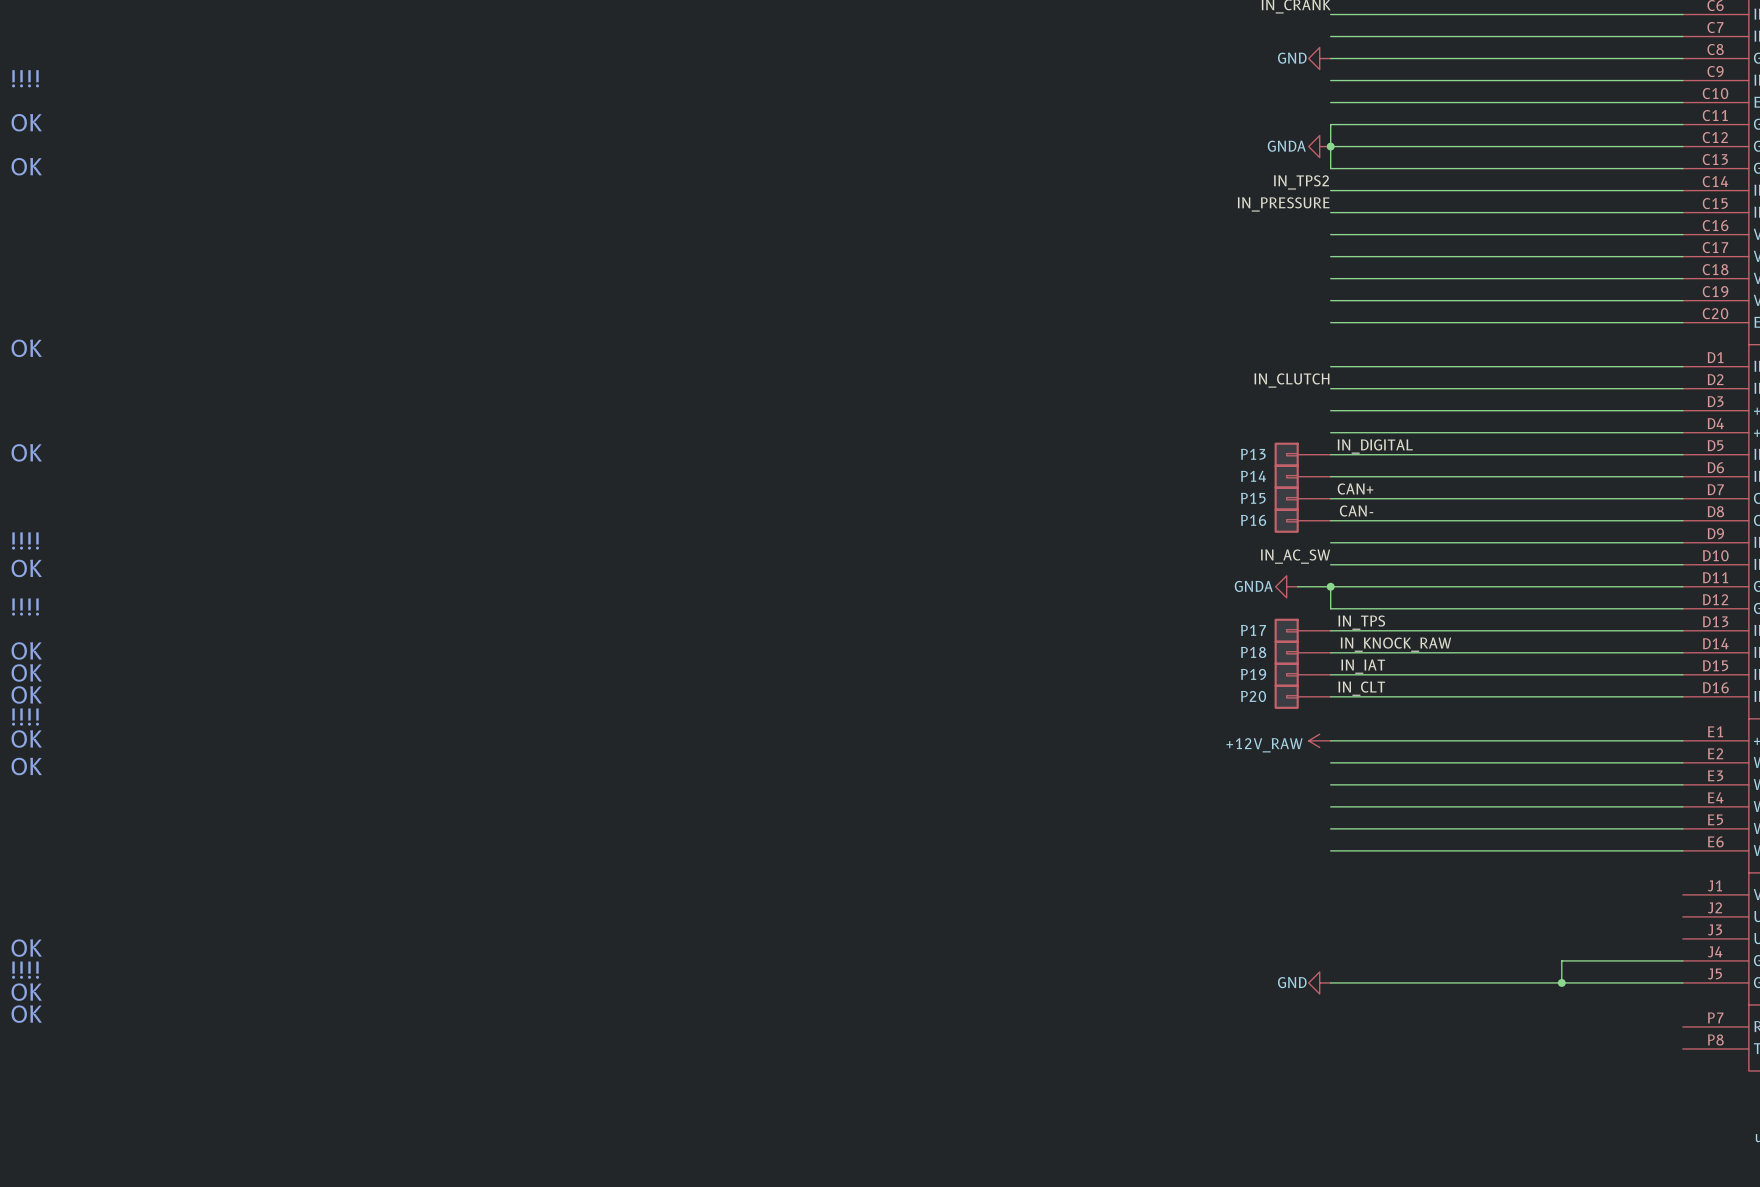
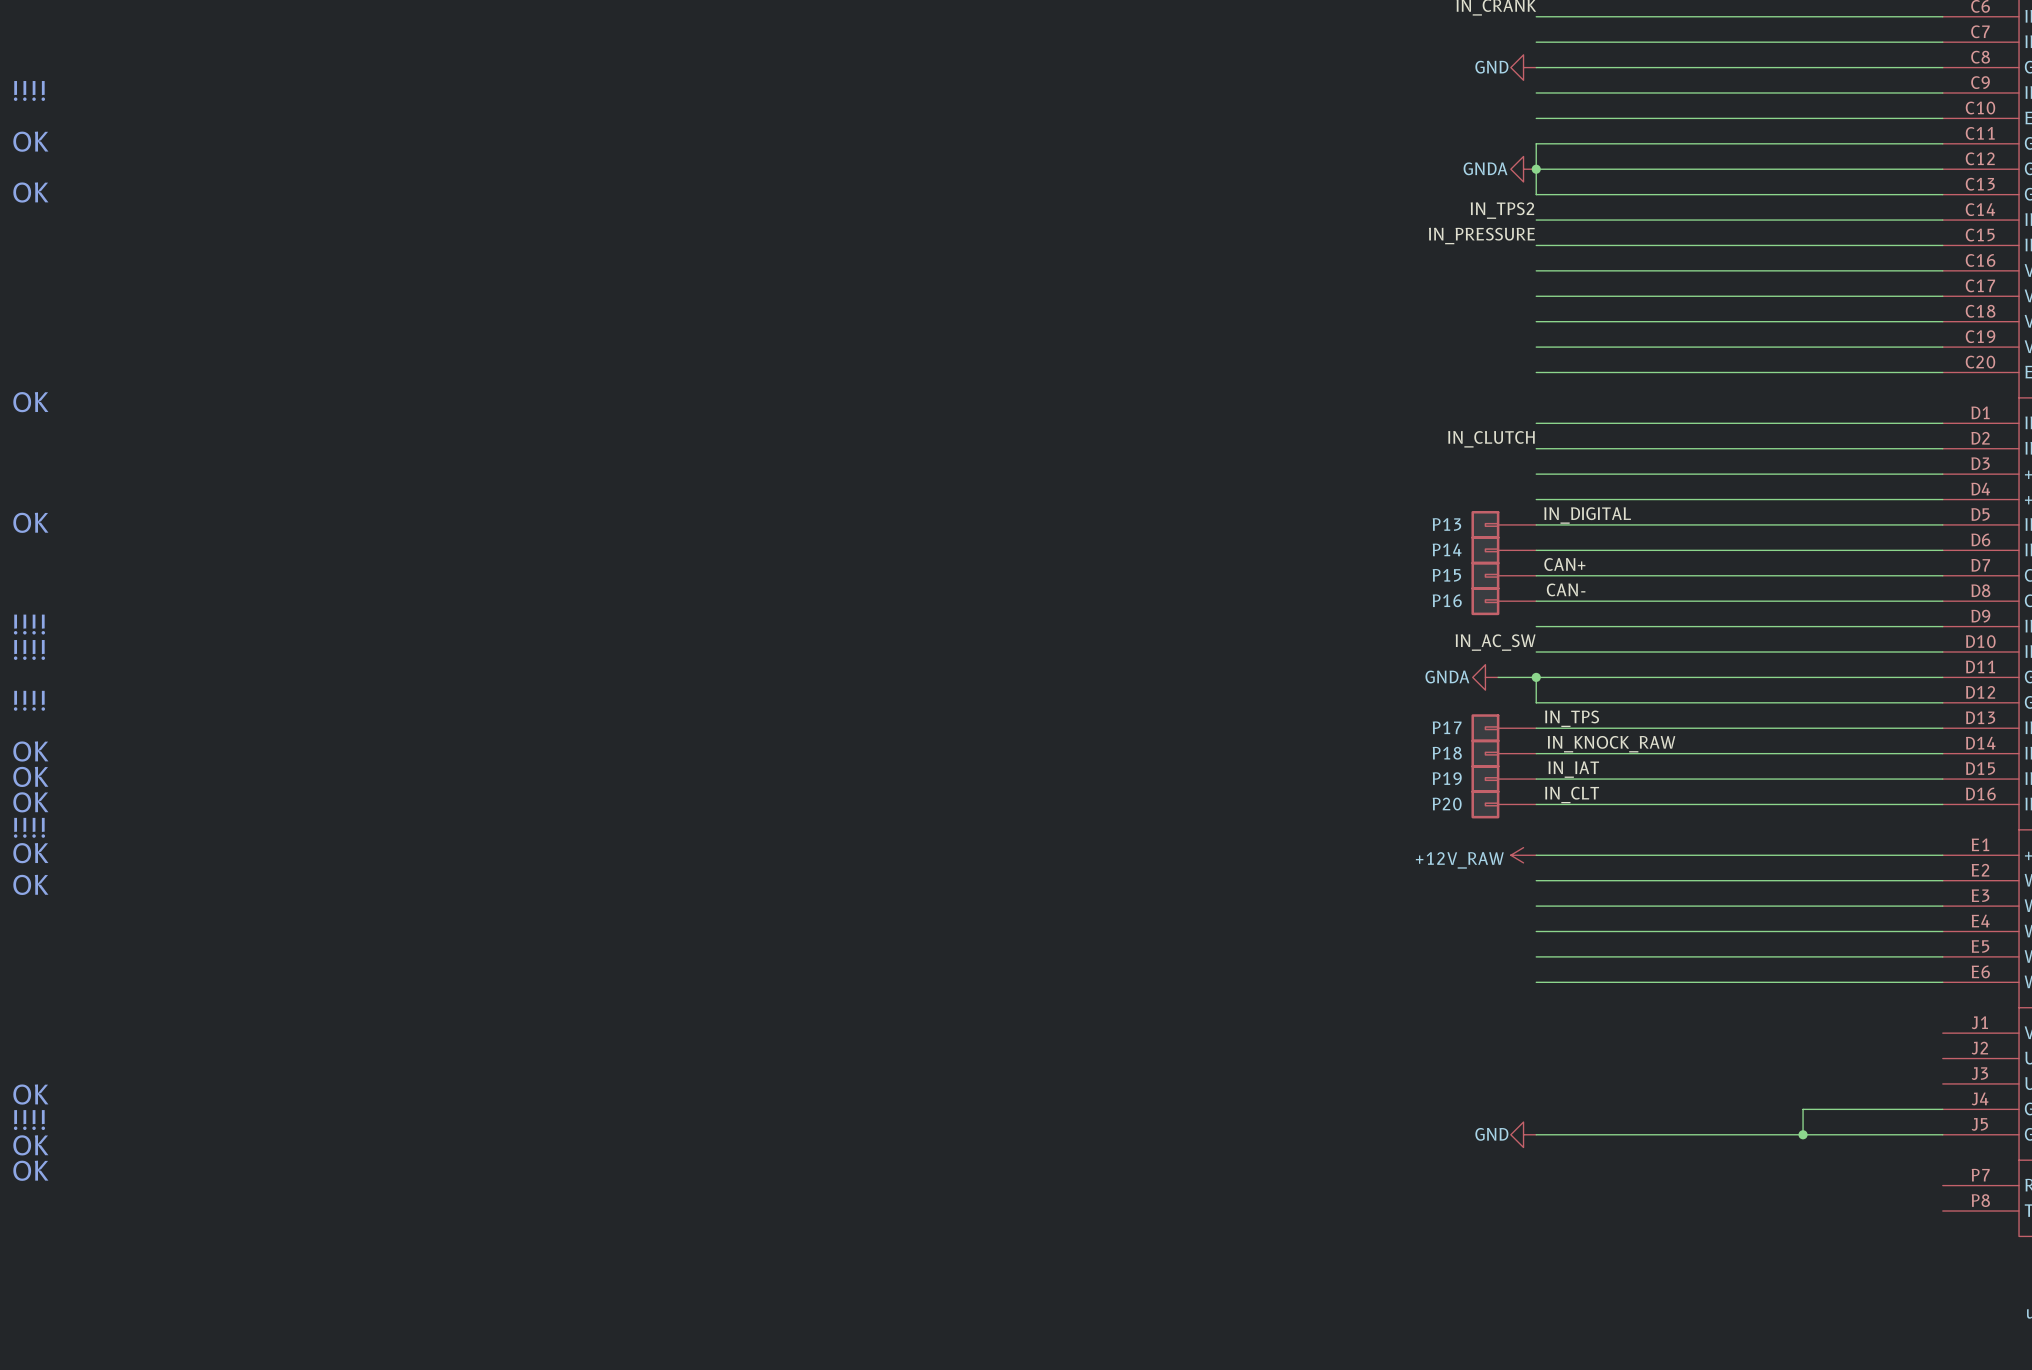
text: OK (26, 568) -> !!!! (29, 649)

